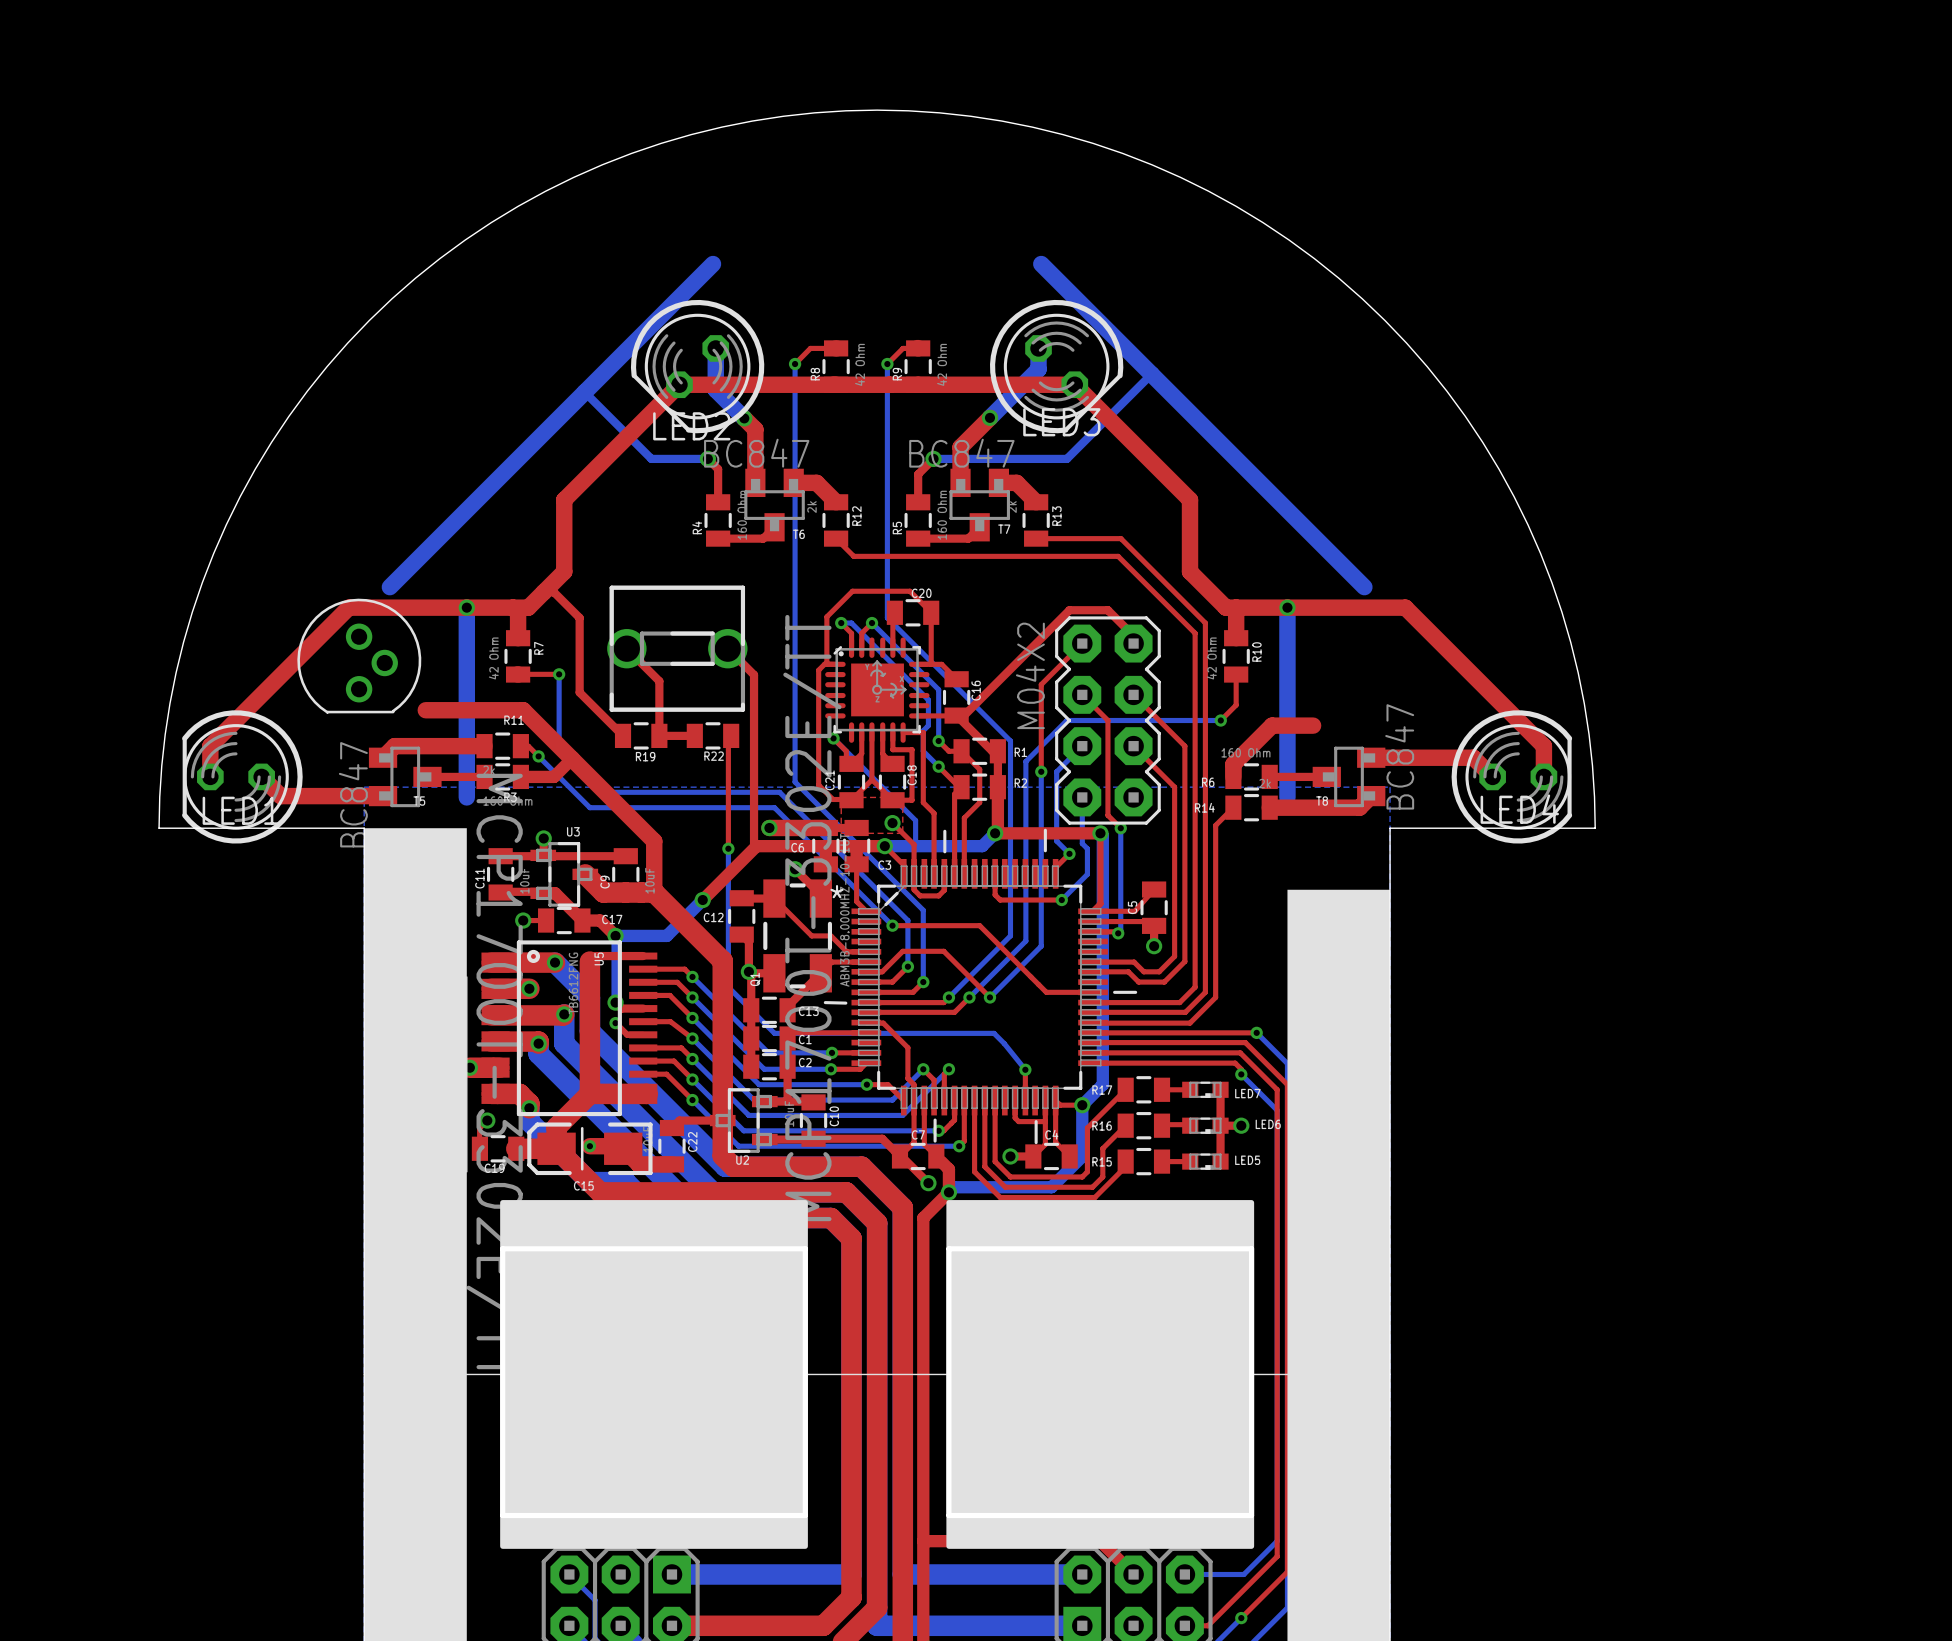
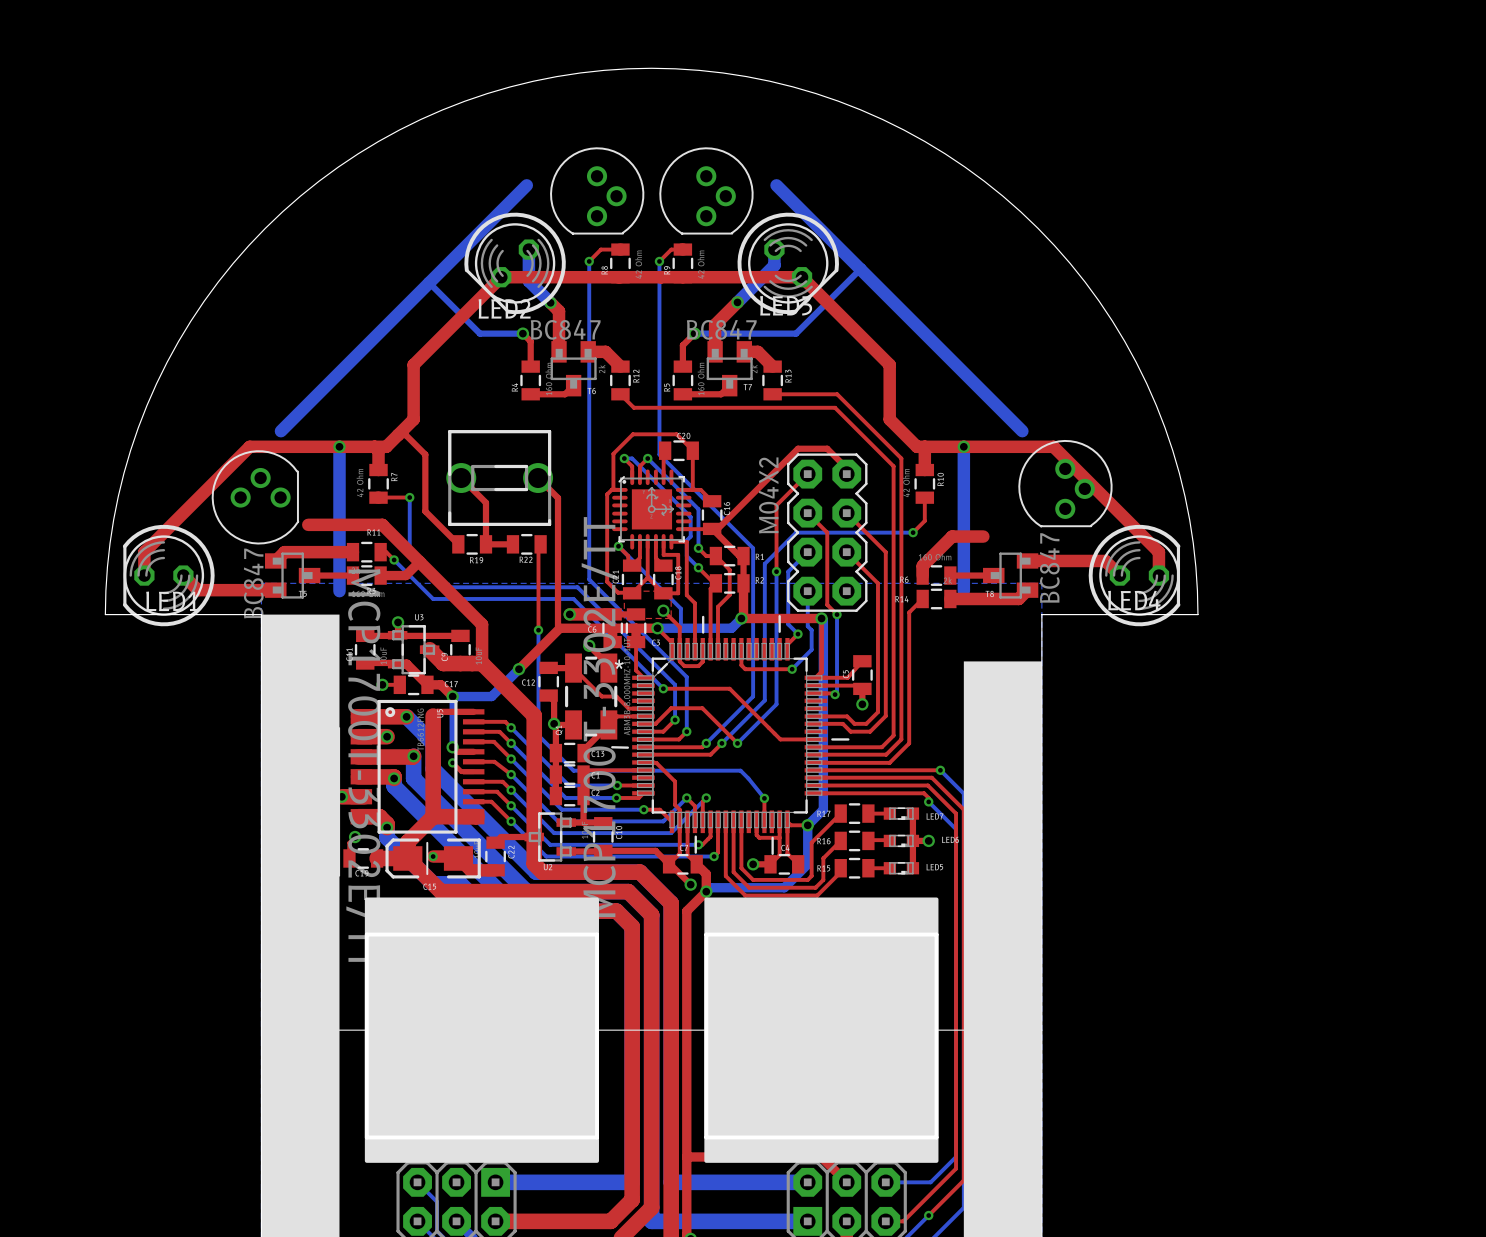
part: none -> (597, 191)
part: none -> (706, 191)
part rotation: 0° (359, 656) -> 90° counterclockwise (255, 497)
part: none -> (1065, 483)

